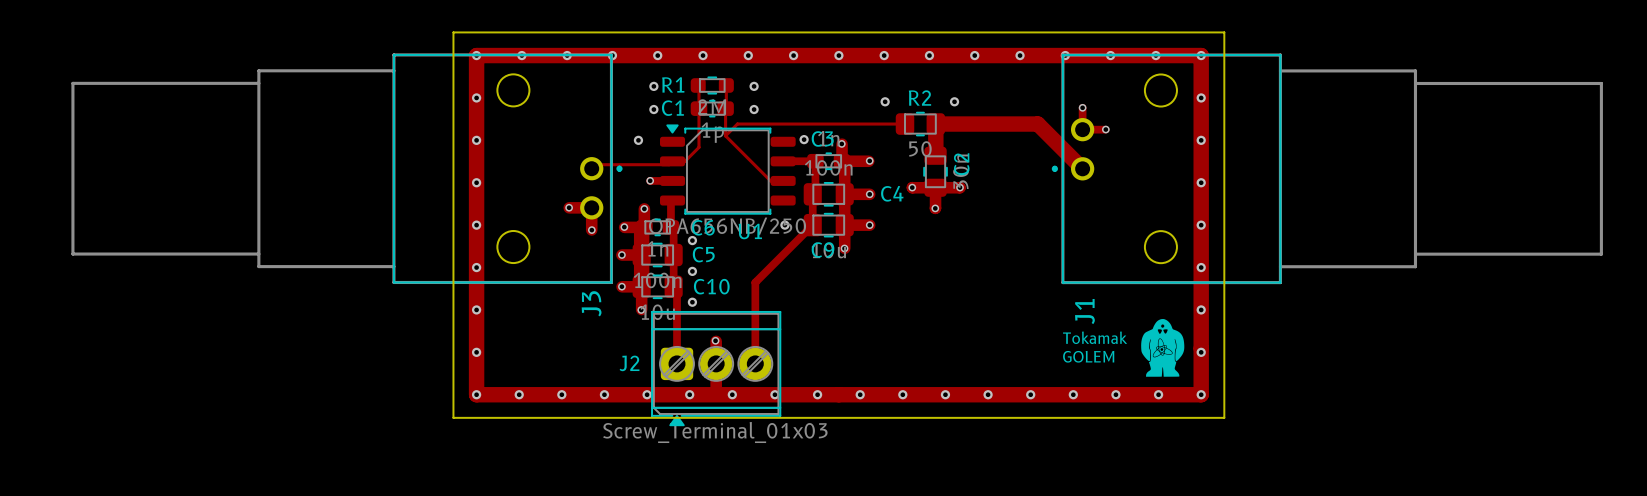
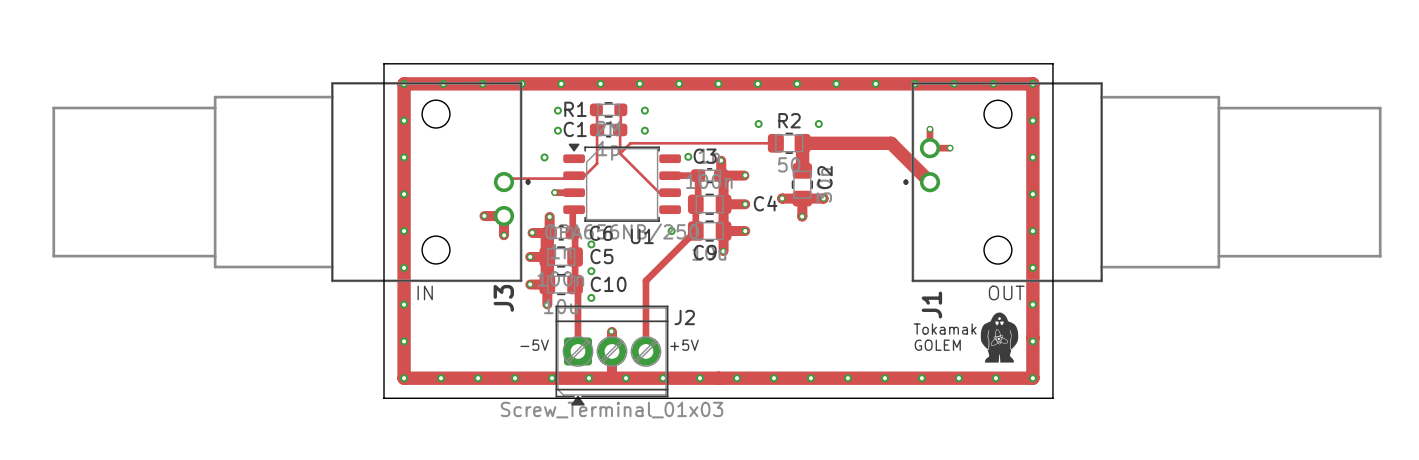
text: none -> IN (425, 292)
text: none -> OUT (1006, 292)
text: none -> -5V (534, 345)
text: none -> +5V (684, 345)
J2 name position: J2 (629, 363) -> J2 (684, 317)

